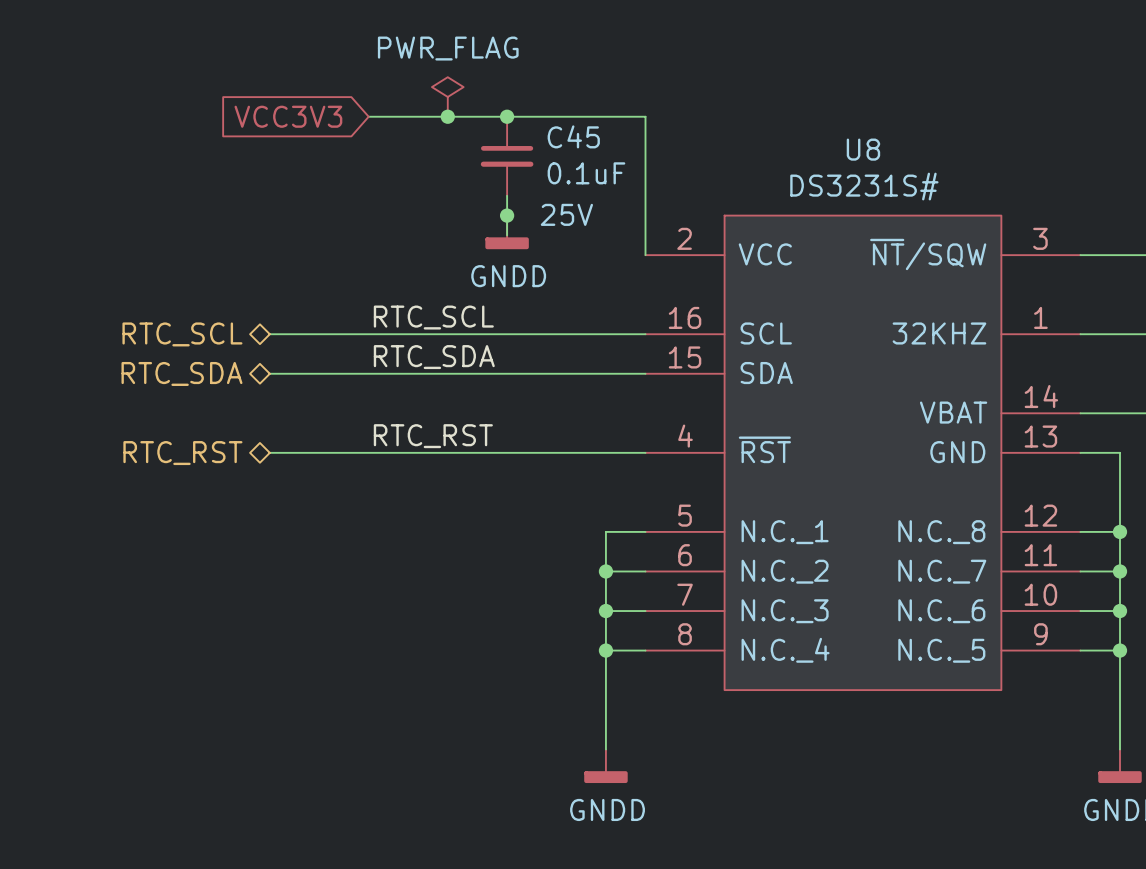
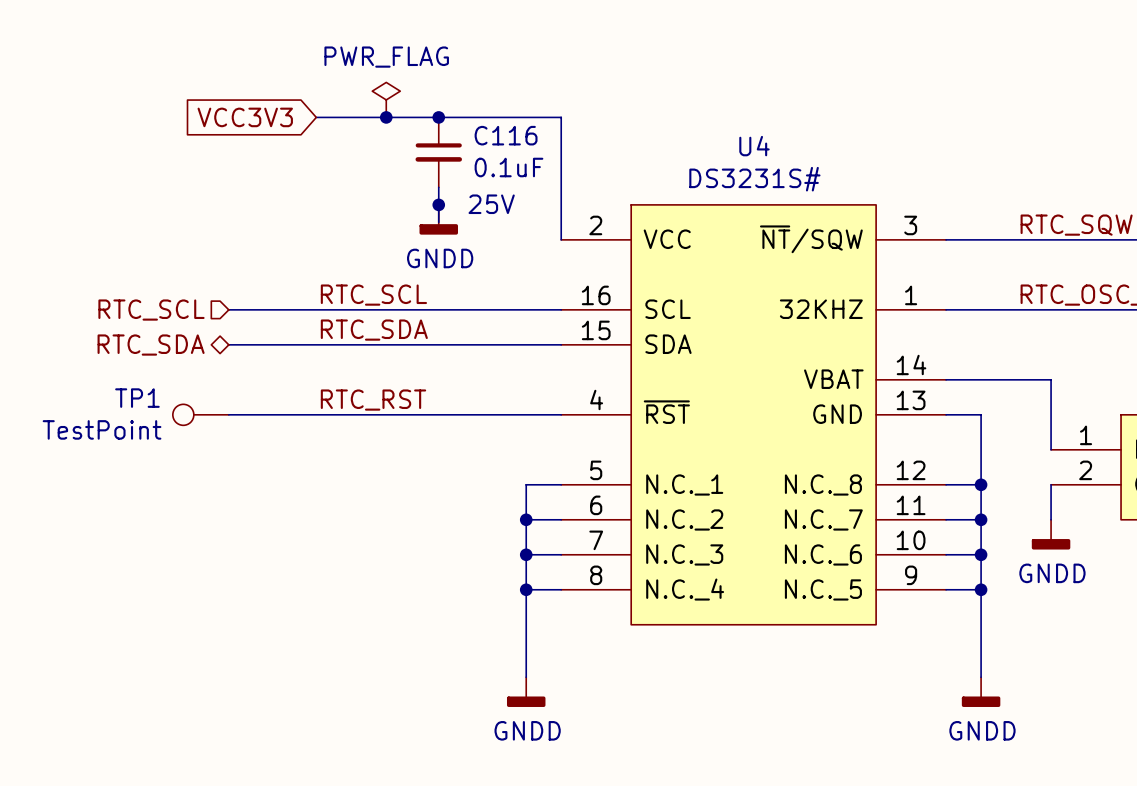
C45 name: C45 (573, 136) -> C116 (506, 135)
U8 name: U8 (863, 149) -> U4 (754, 146)
hierarchical label shape: bidirectional (182, 334) -> input (151, 310)
TP1: none -> TestPoint (200, 414)
hierarchical label: RTC_RST (182, 453) -> none

